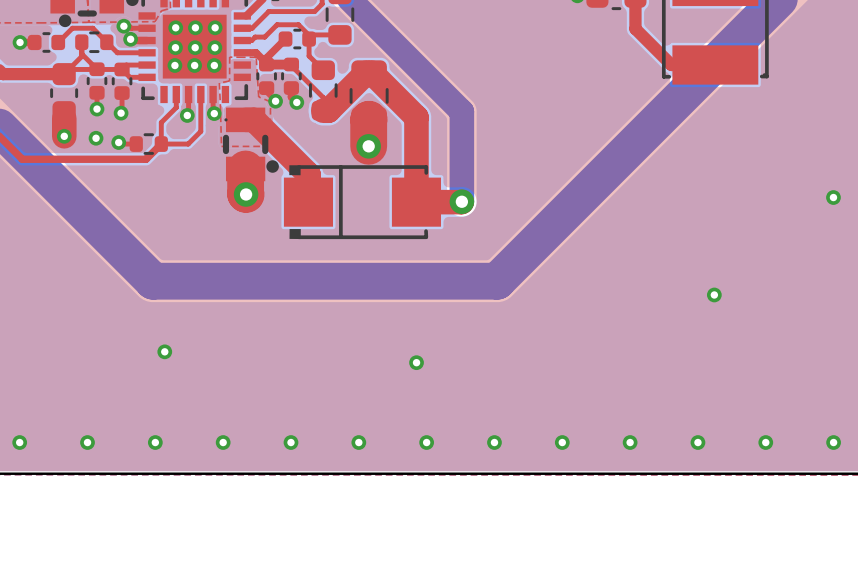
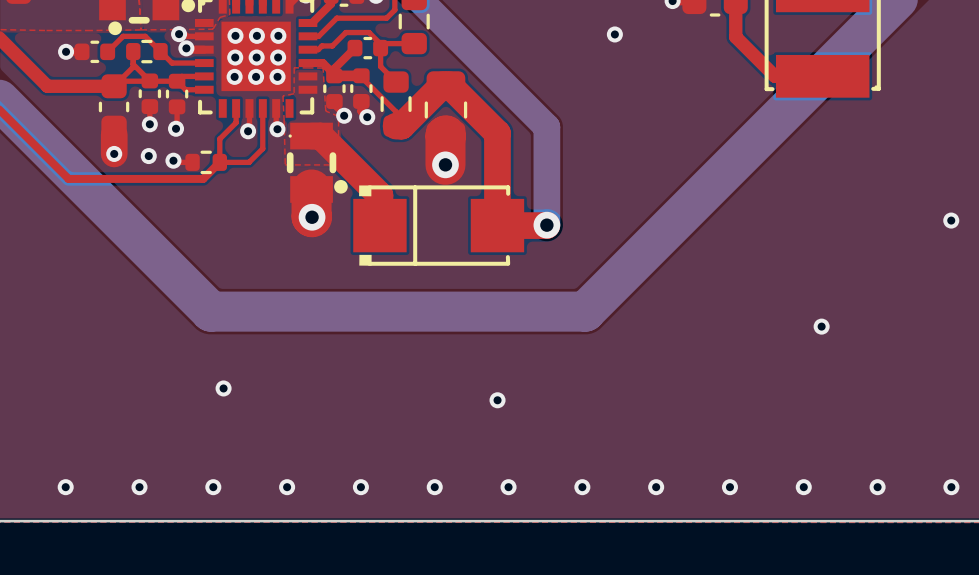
via: none -> (614, 34)

